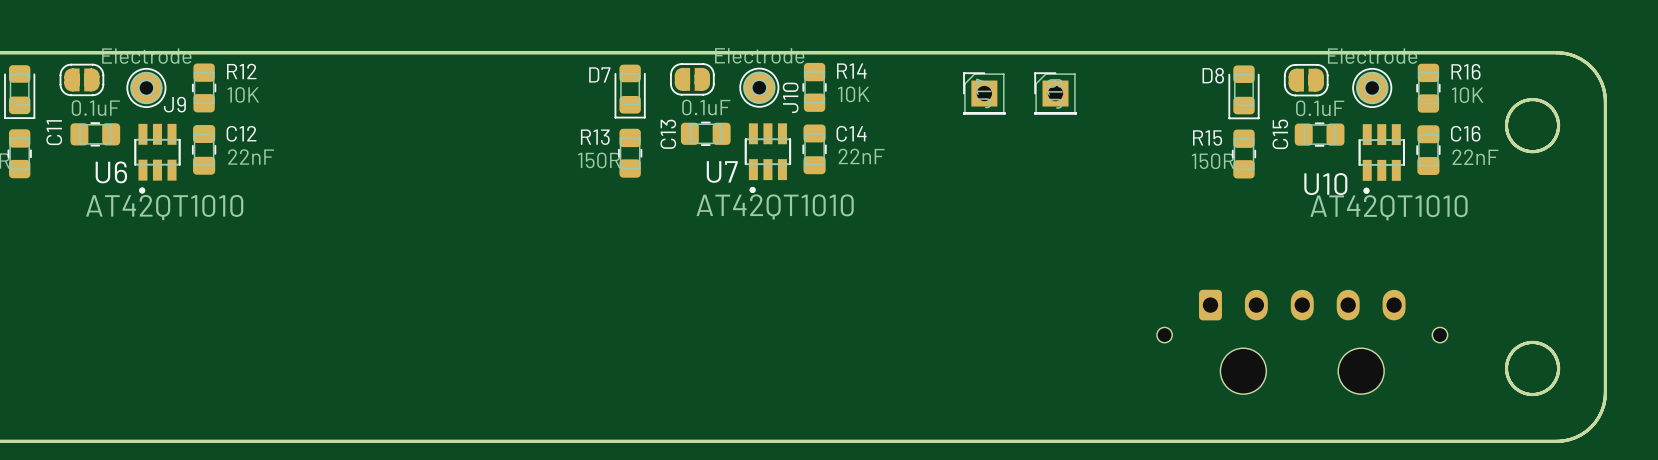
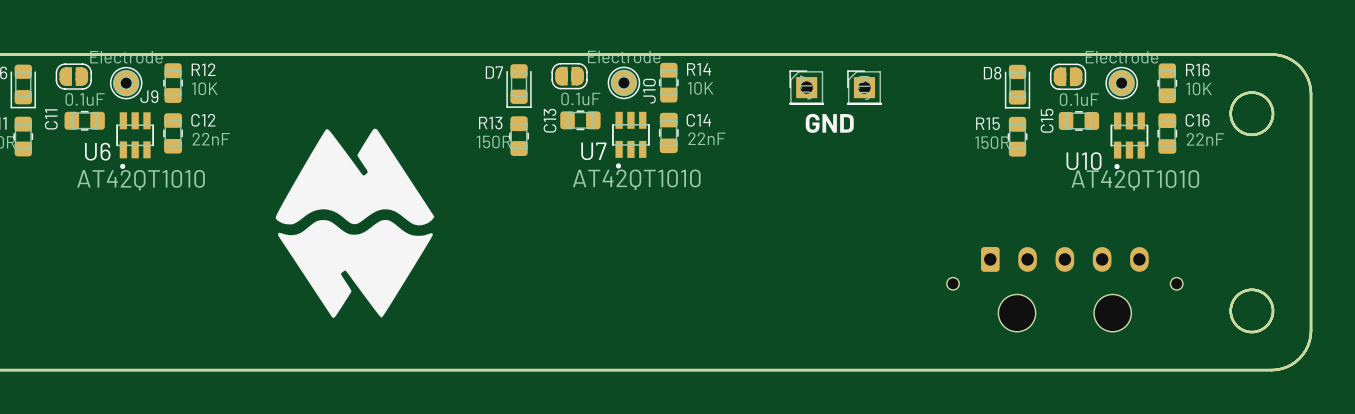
text: none -> GND (829, 123)
drawing: none -> [275, 128, 435, 318]

